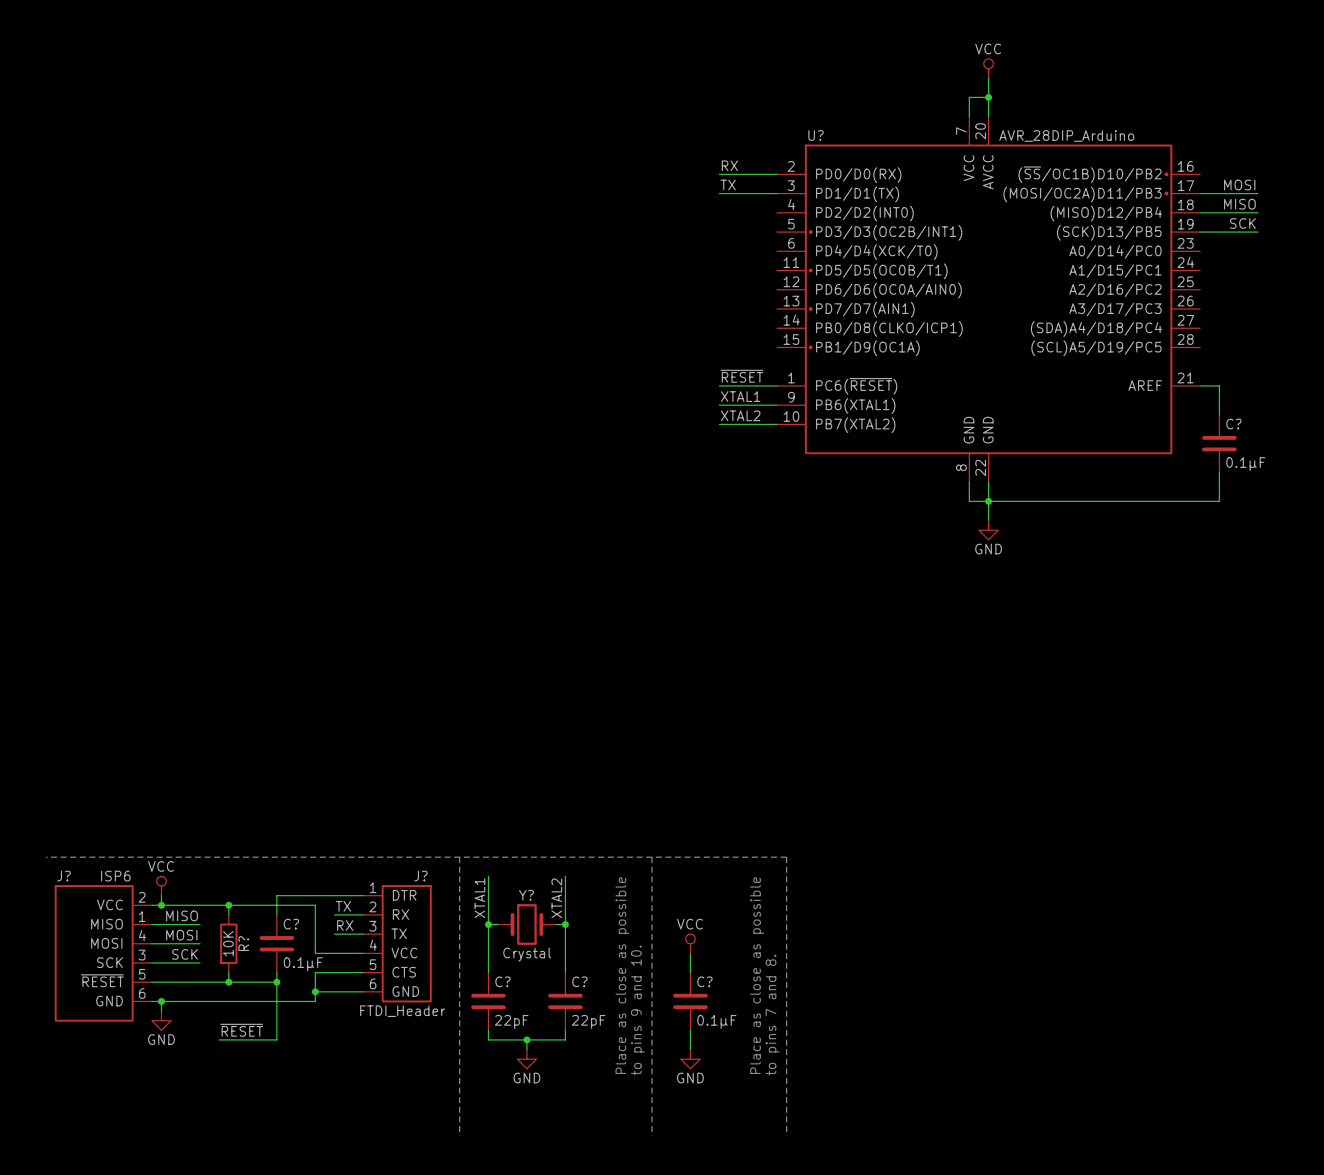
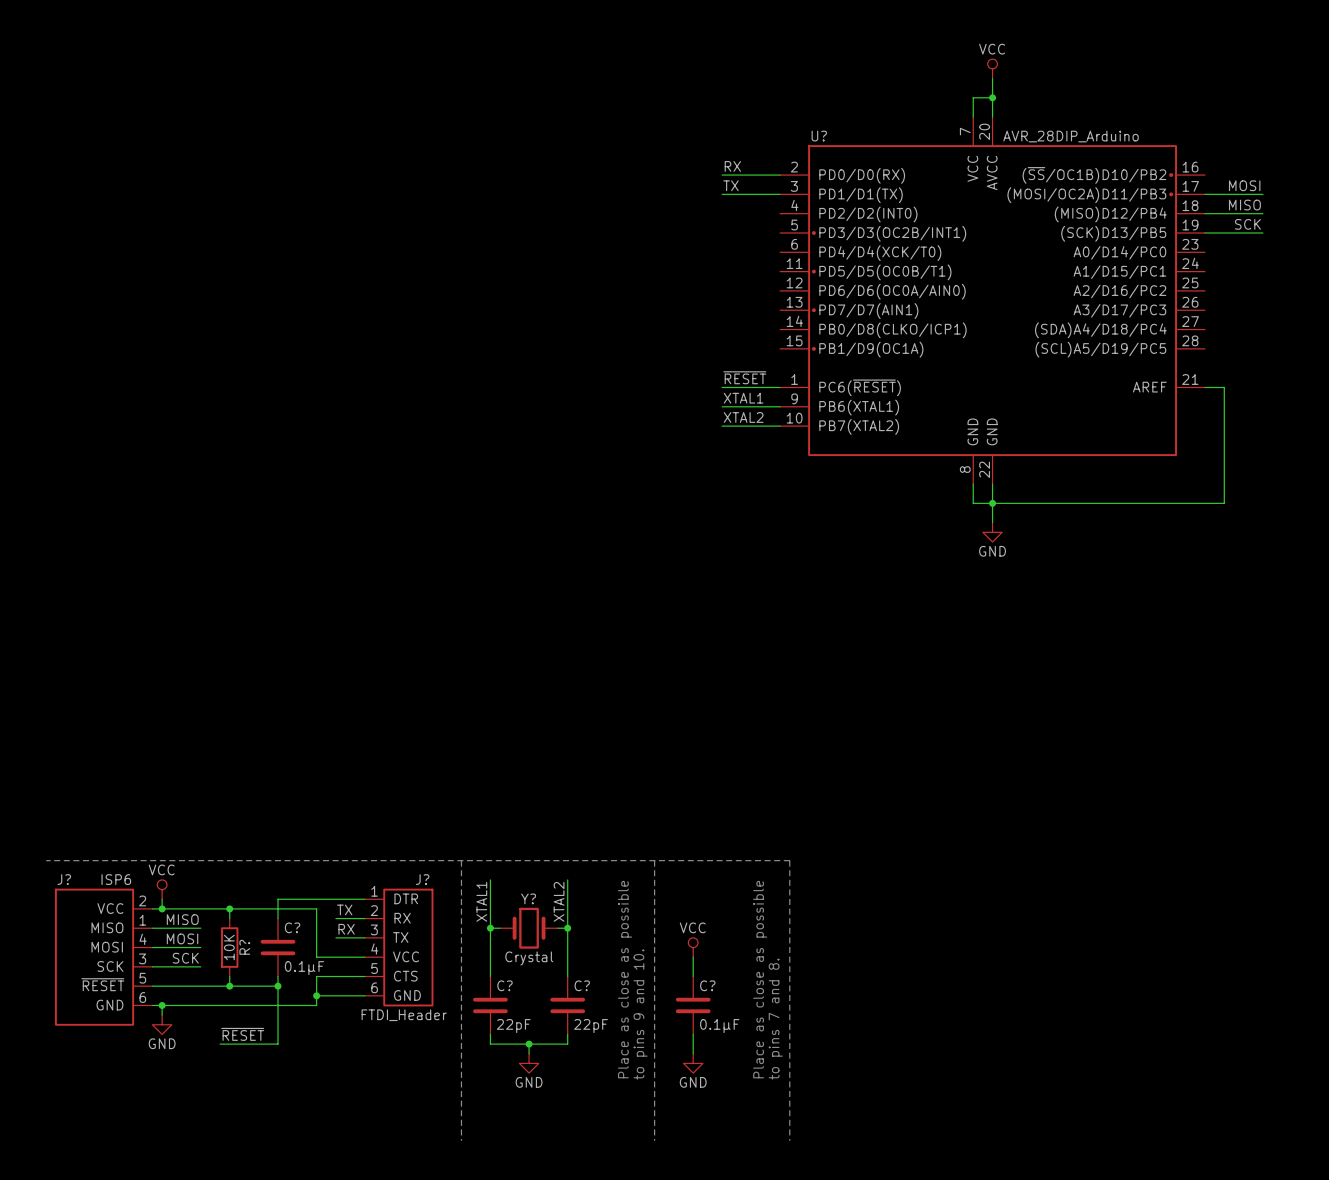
C?: 0.1μF (1219, 443) -> none

